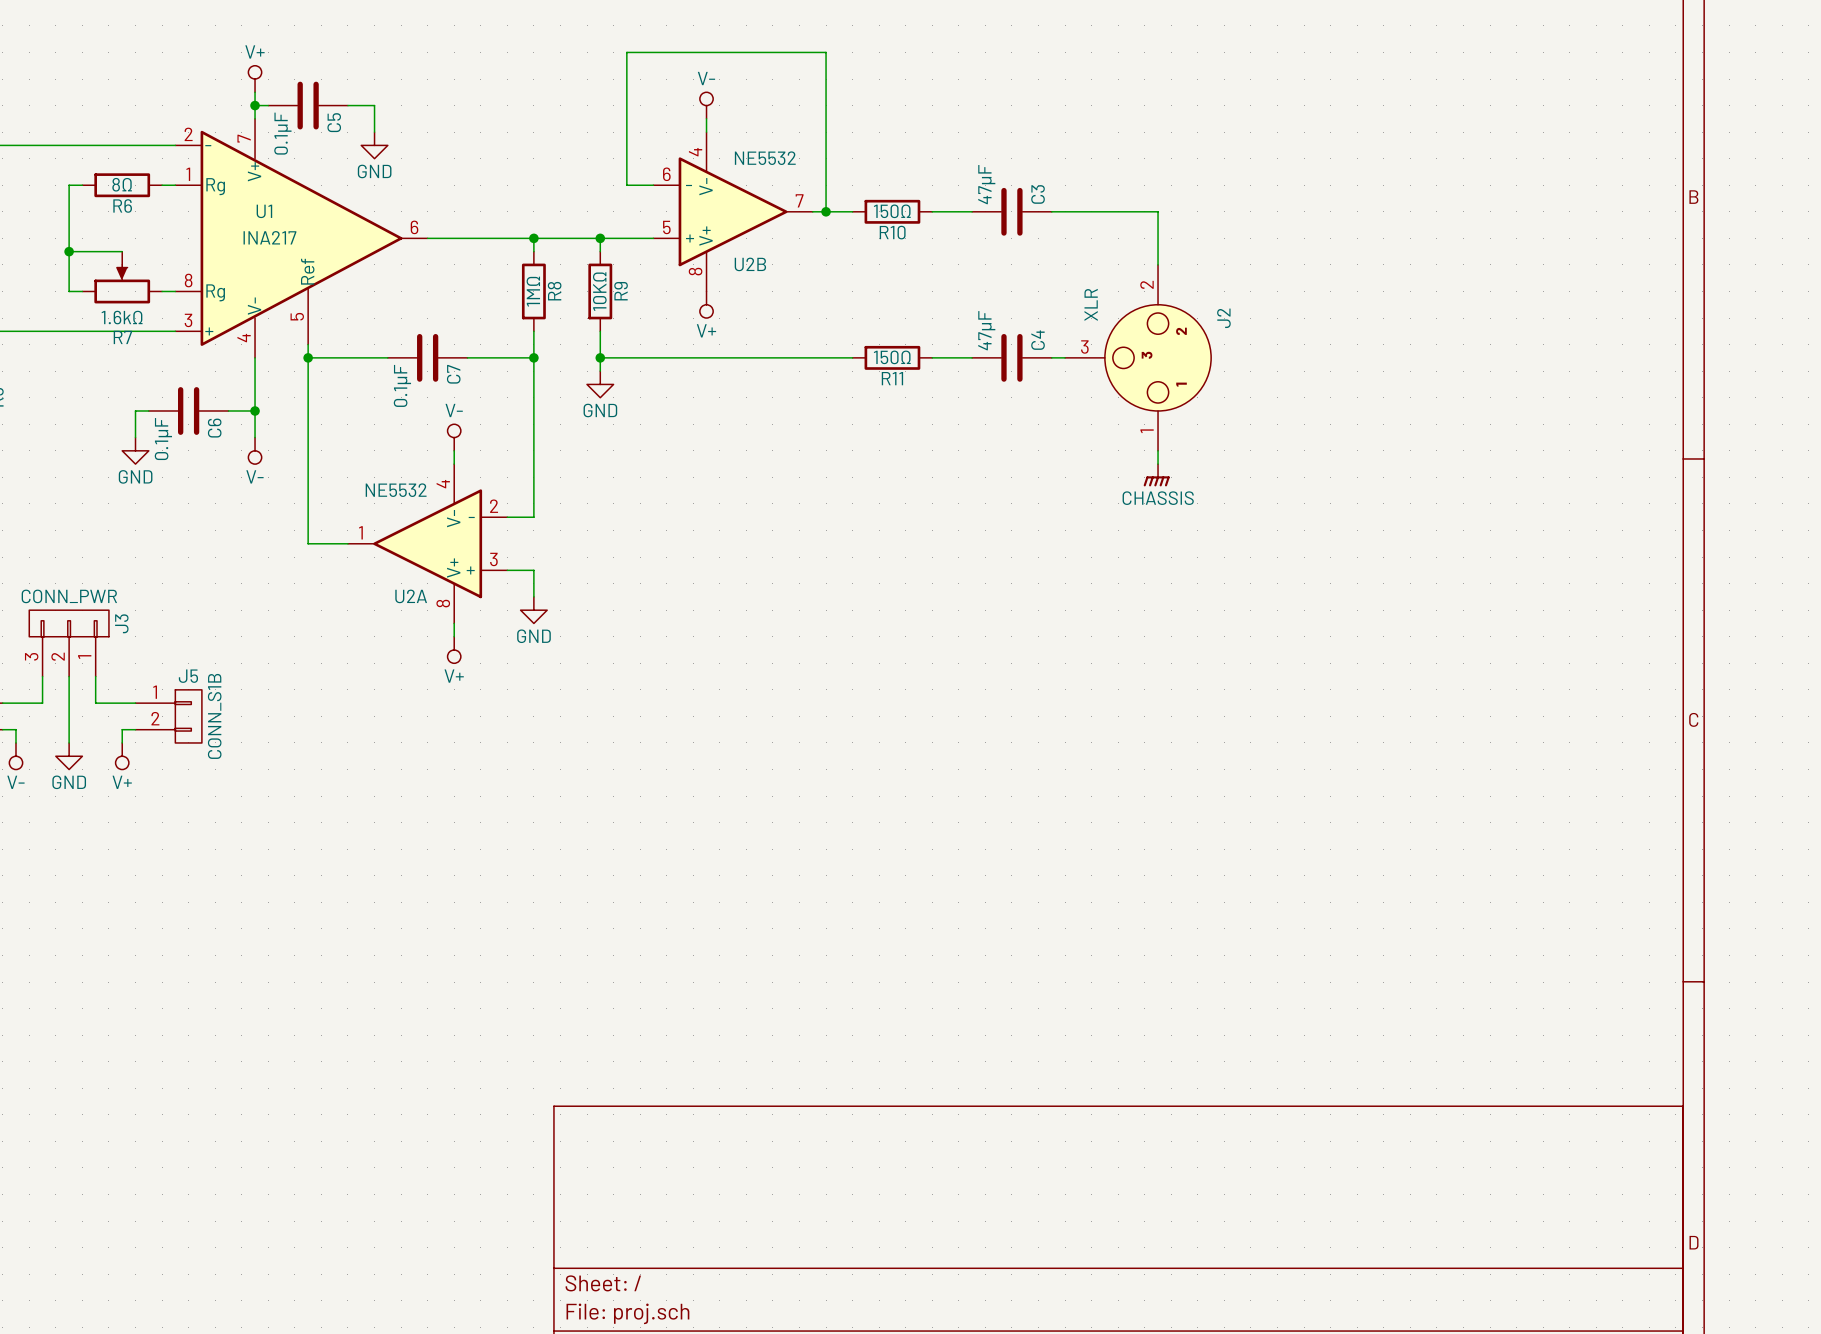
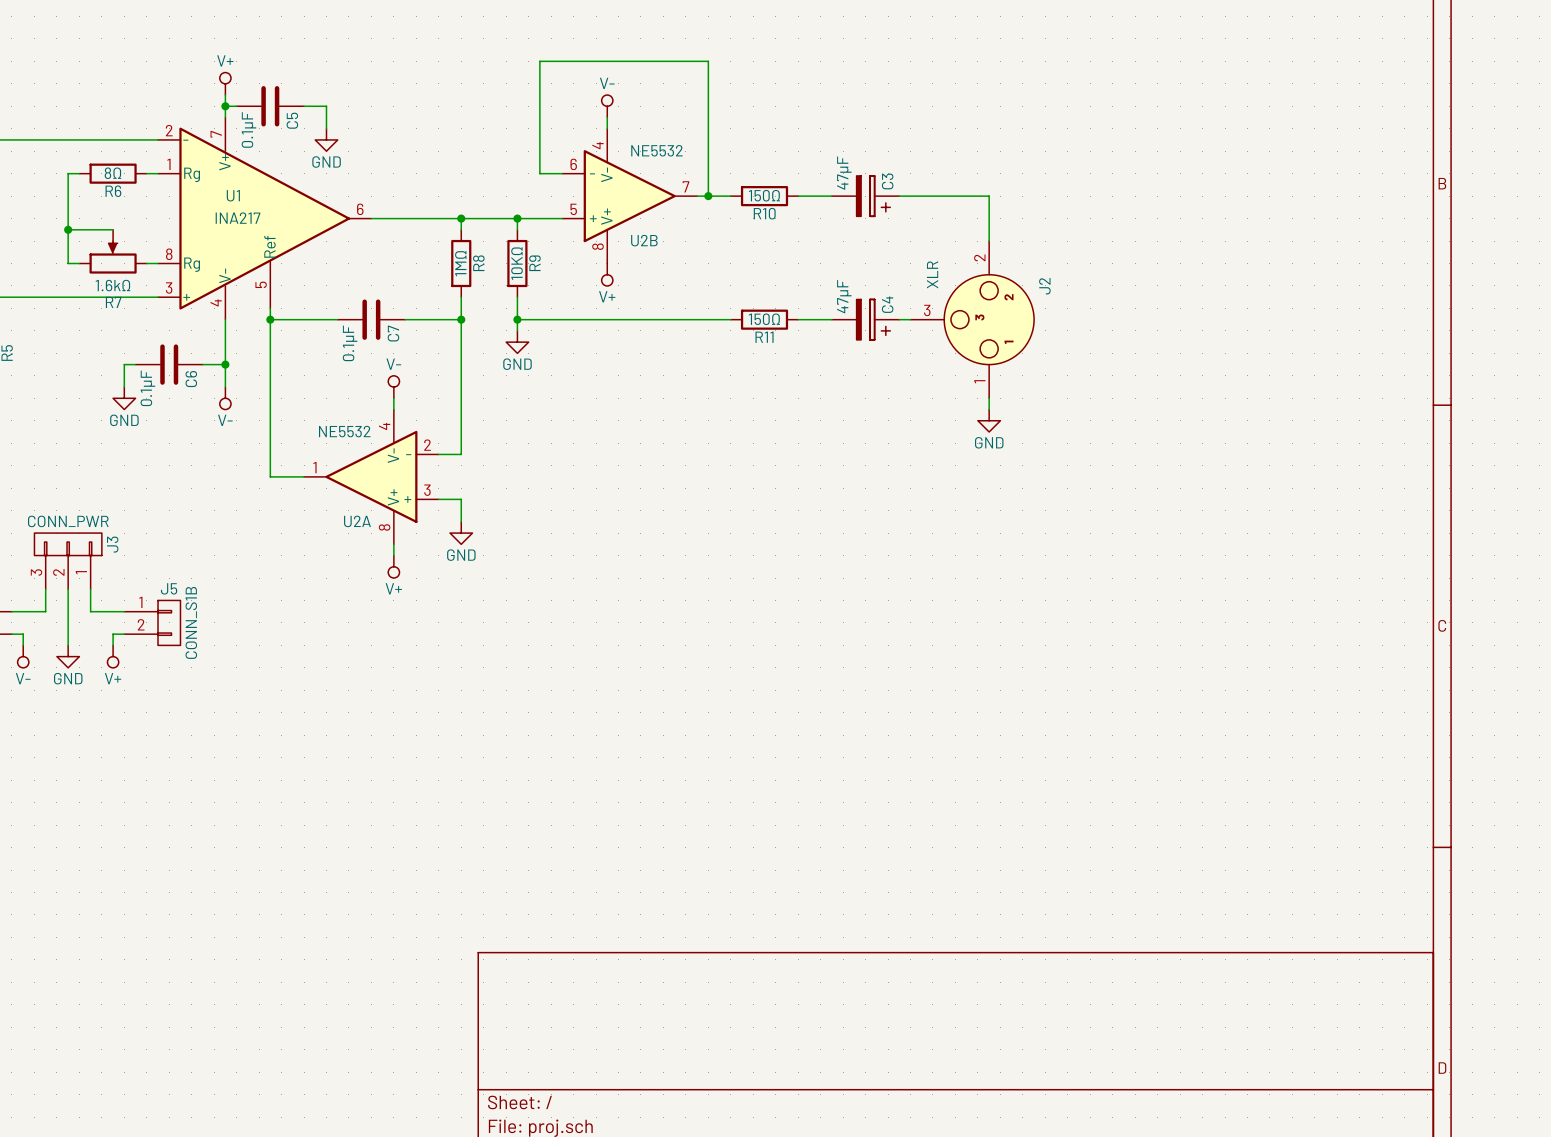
C3 symbol: [972, 187, 1052, 236] -> [831, 175, 900, 217]
C4 symbol: [972, 333, 1052, 382] -> [831, 299, 900, 340]
power symbol: CHASSIS (1156, 475) -> GND (989, 420)

